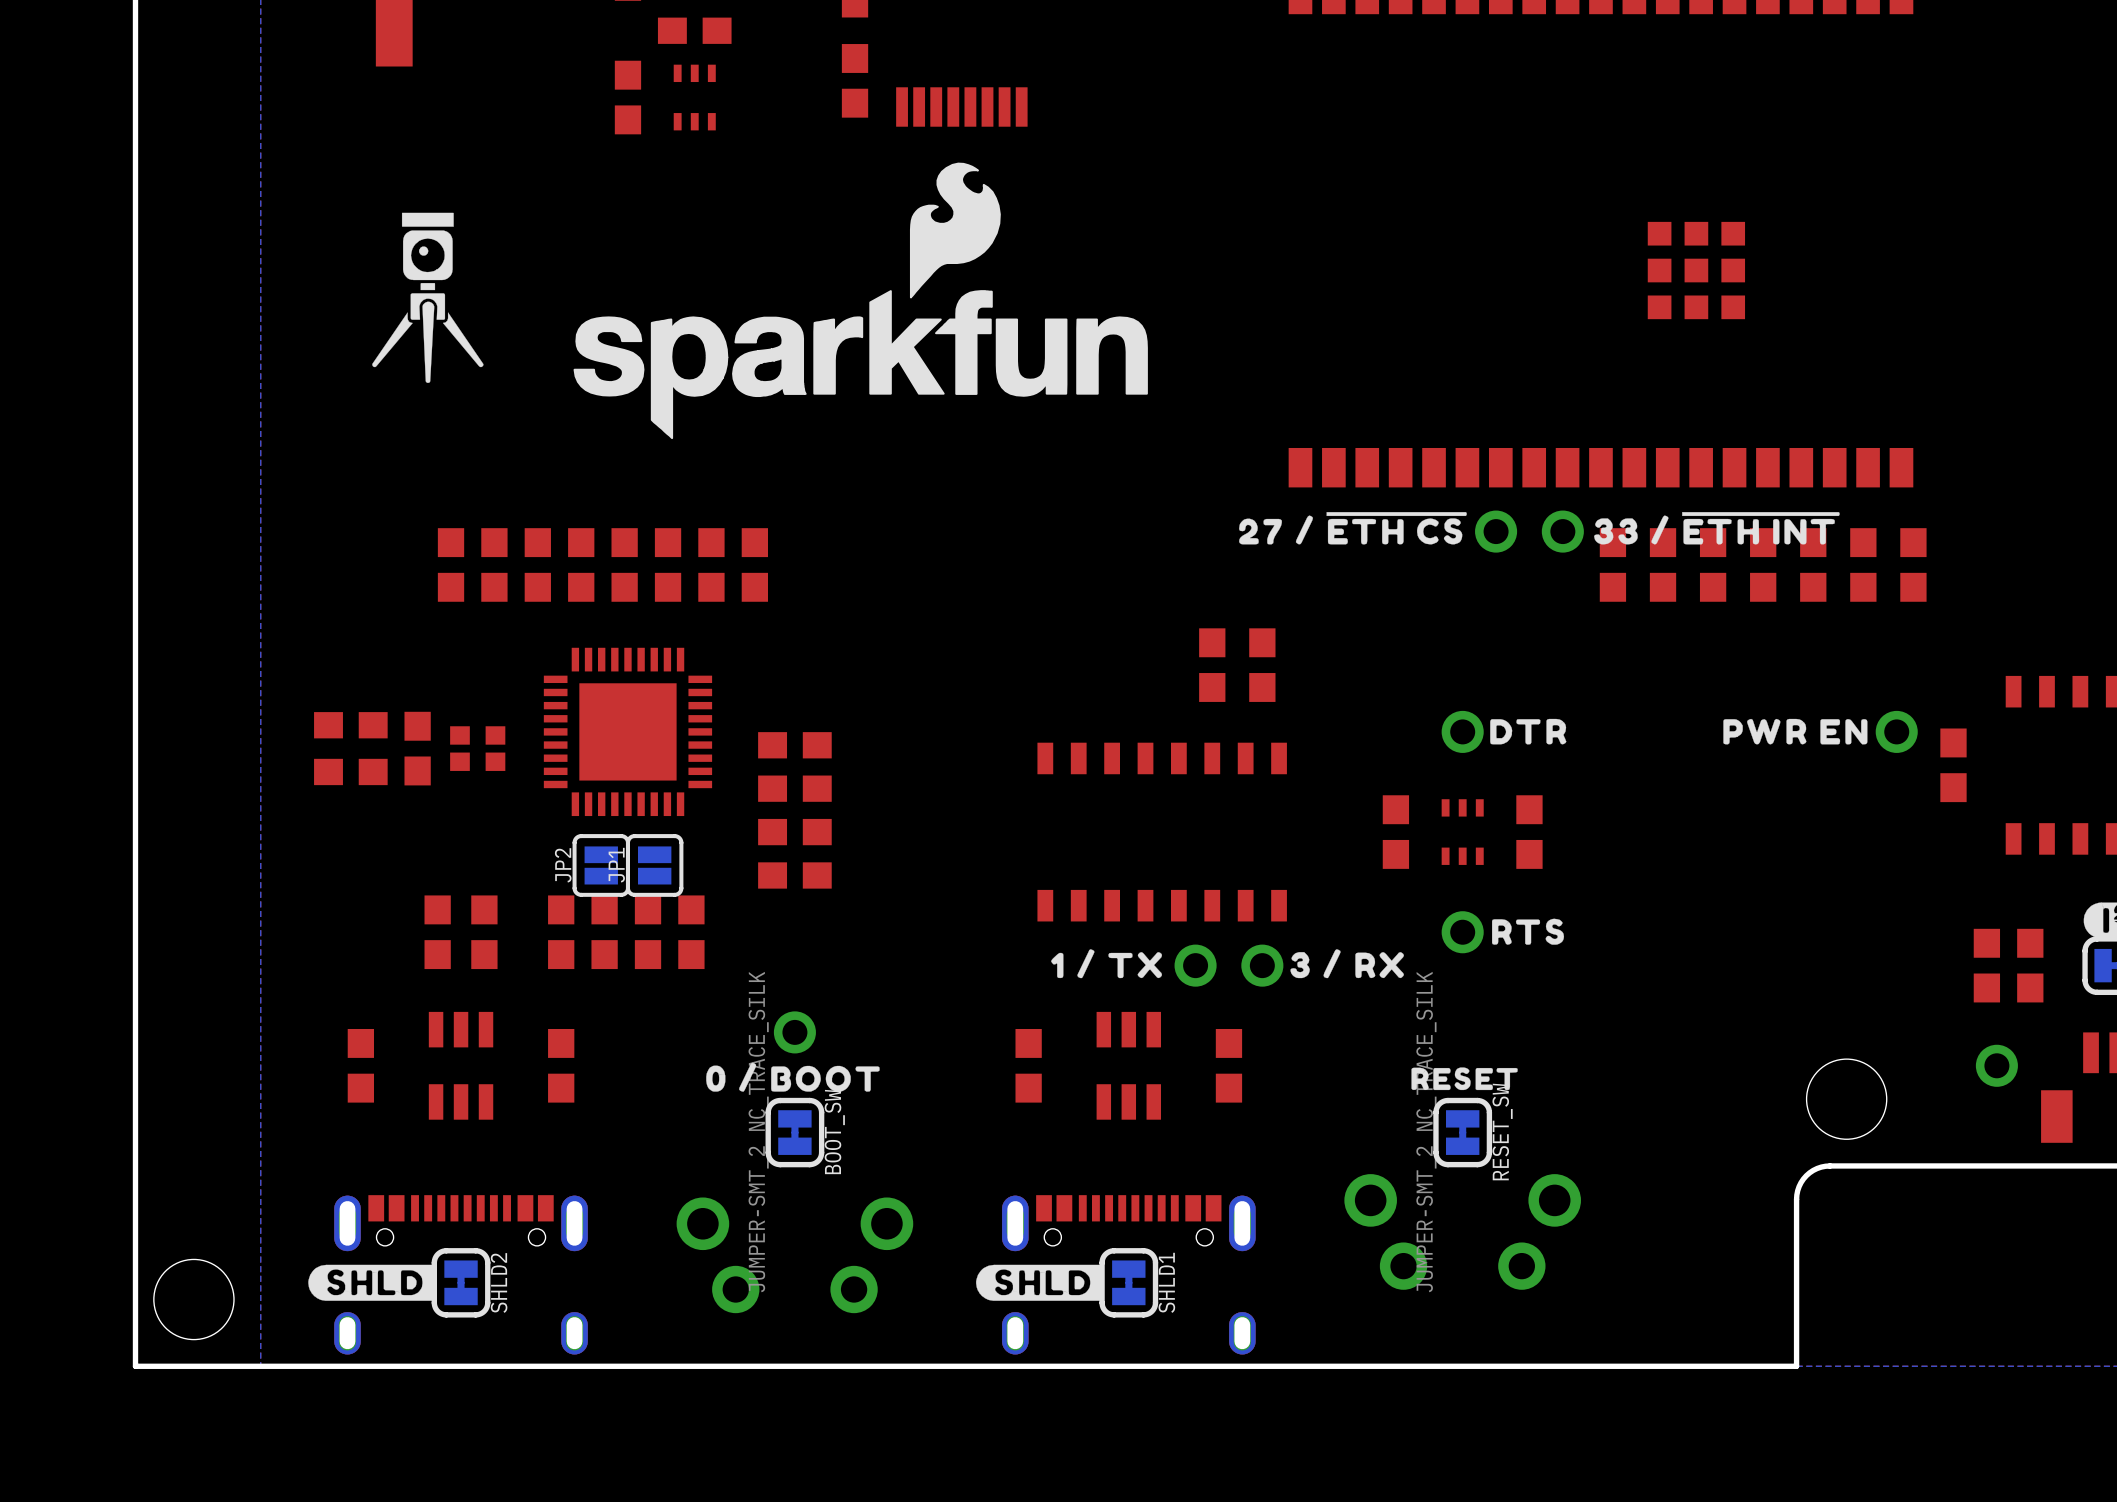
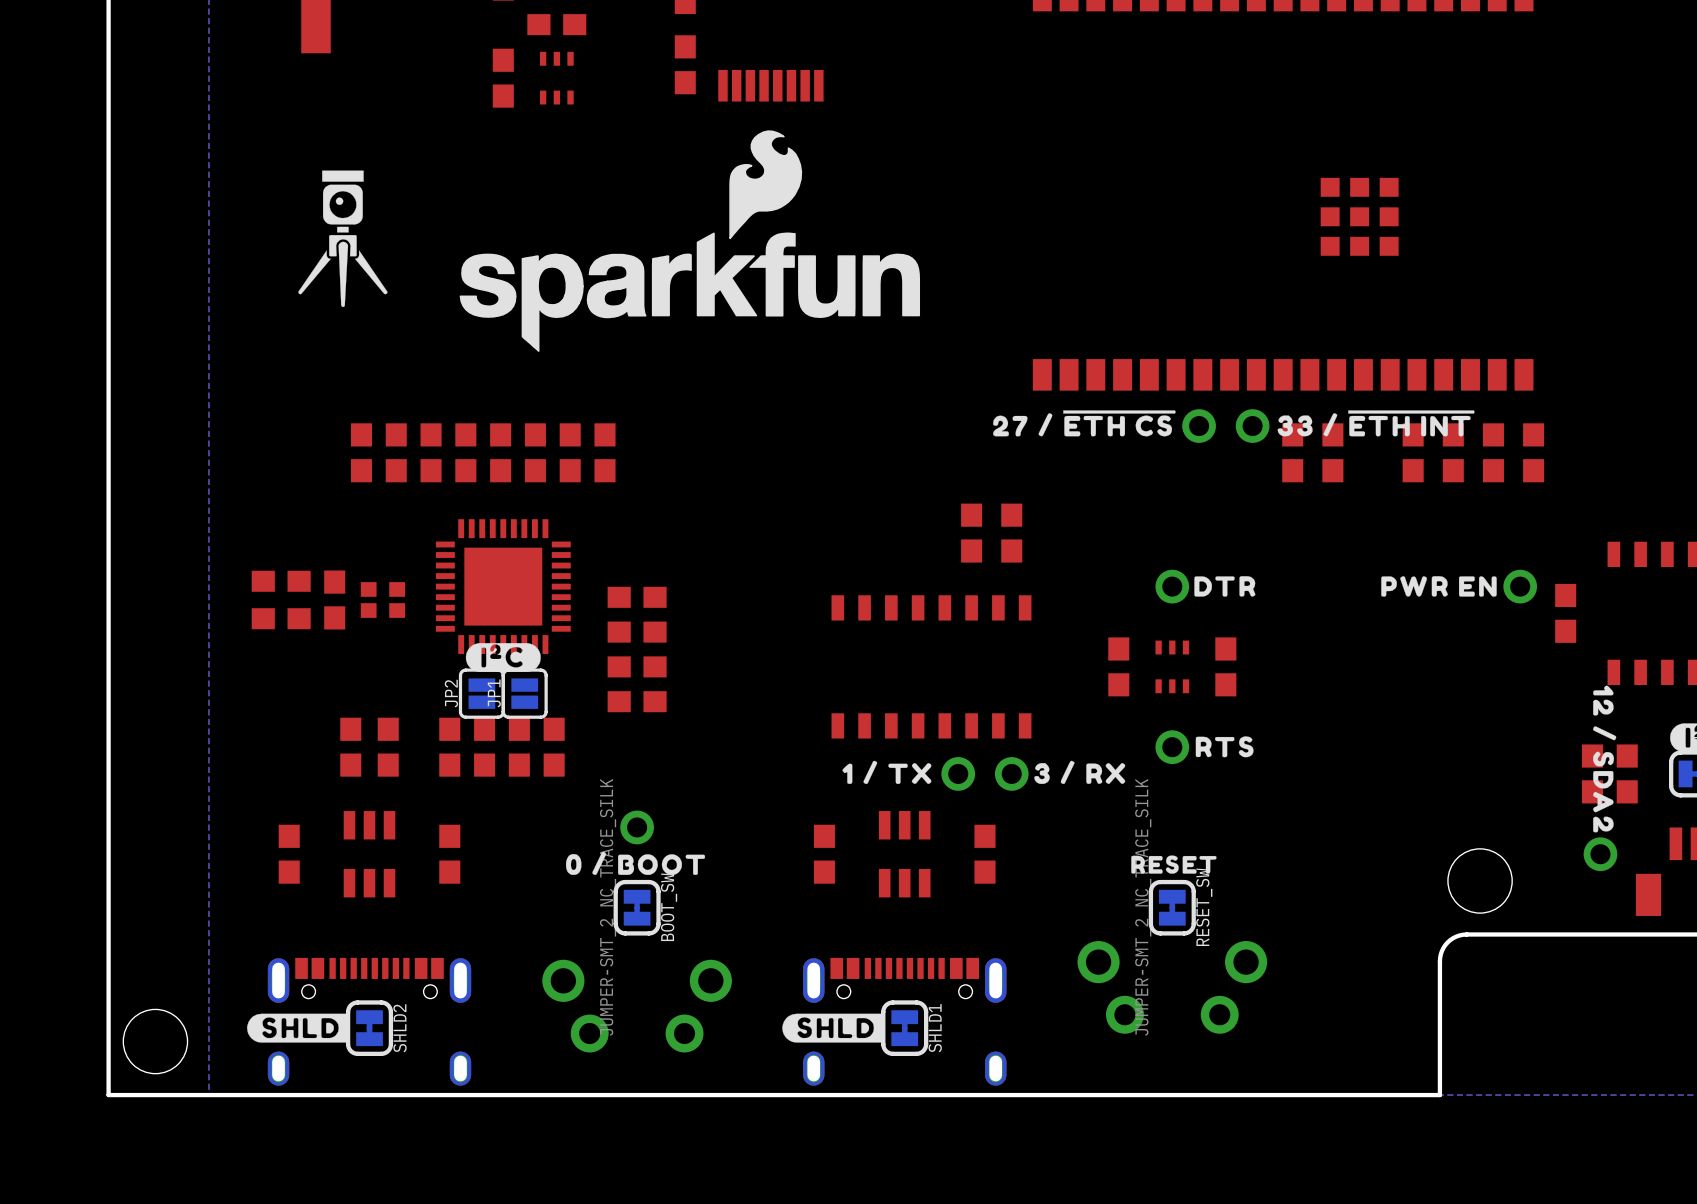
part: (1713, 564) -> none
drawing: none -> [465, 643, 541, 672]
drawing: none -> [1593, 685, 1617, 833]

